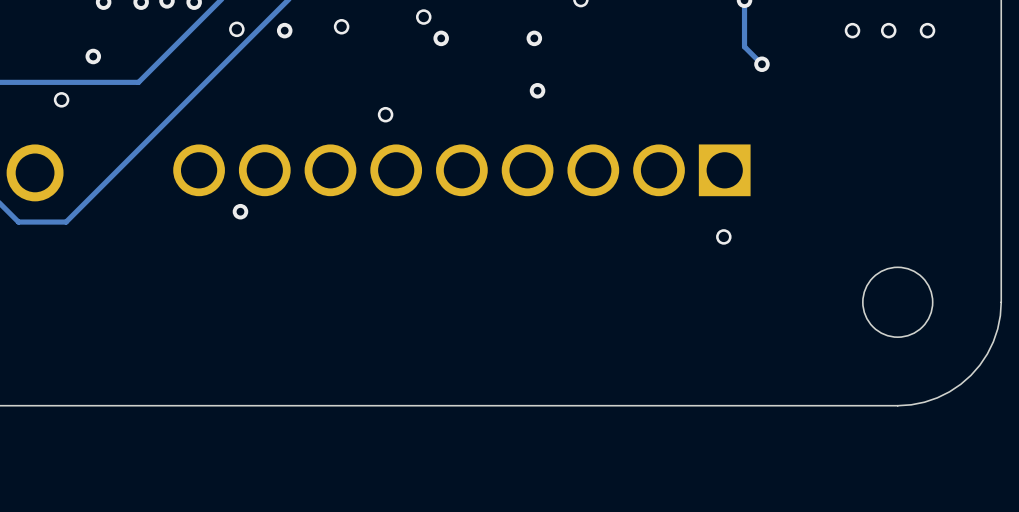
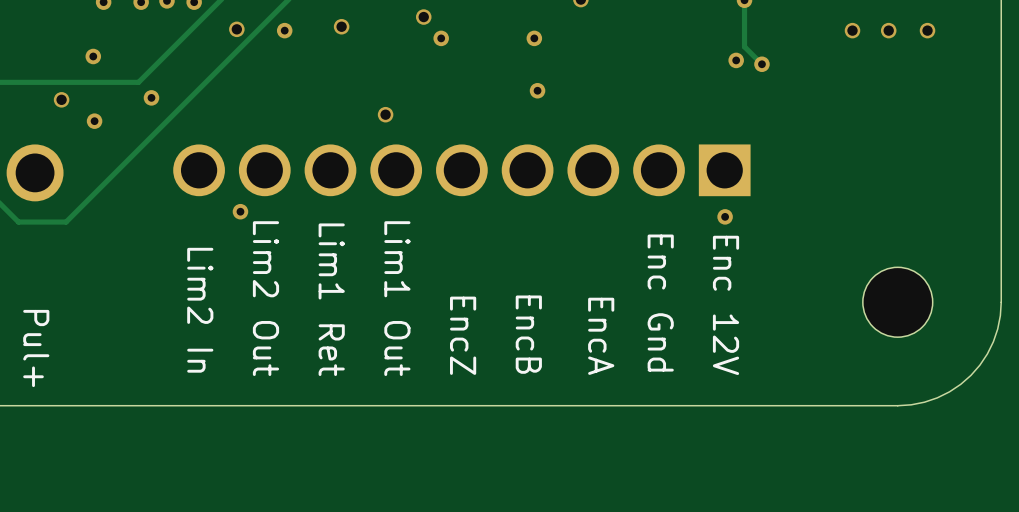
via: none -> (736, 60)
via: none -> (151, 97)
via: none -> (94, 121)
via: none -> (725, 216)
via: (723, 236) -> none
text: none -> Lim2 Out (265, 298)
text: none -> Lim1 Out (397, 298)
text: none -> Lim1 Ret (331, 299)
text: none -> Enc Gnd (660, 303)
text: none -> Enc 12V (726, 305)
text: none -> Lim2 In (200, 310)
text: none -> EncB (528, 334)
text: none -> EncZ (463, 335)
text: none -> EncA (601, 336)
text: none -> Pul+ (36, 348)

